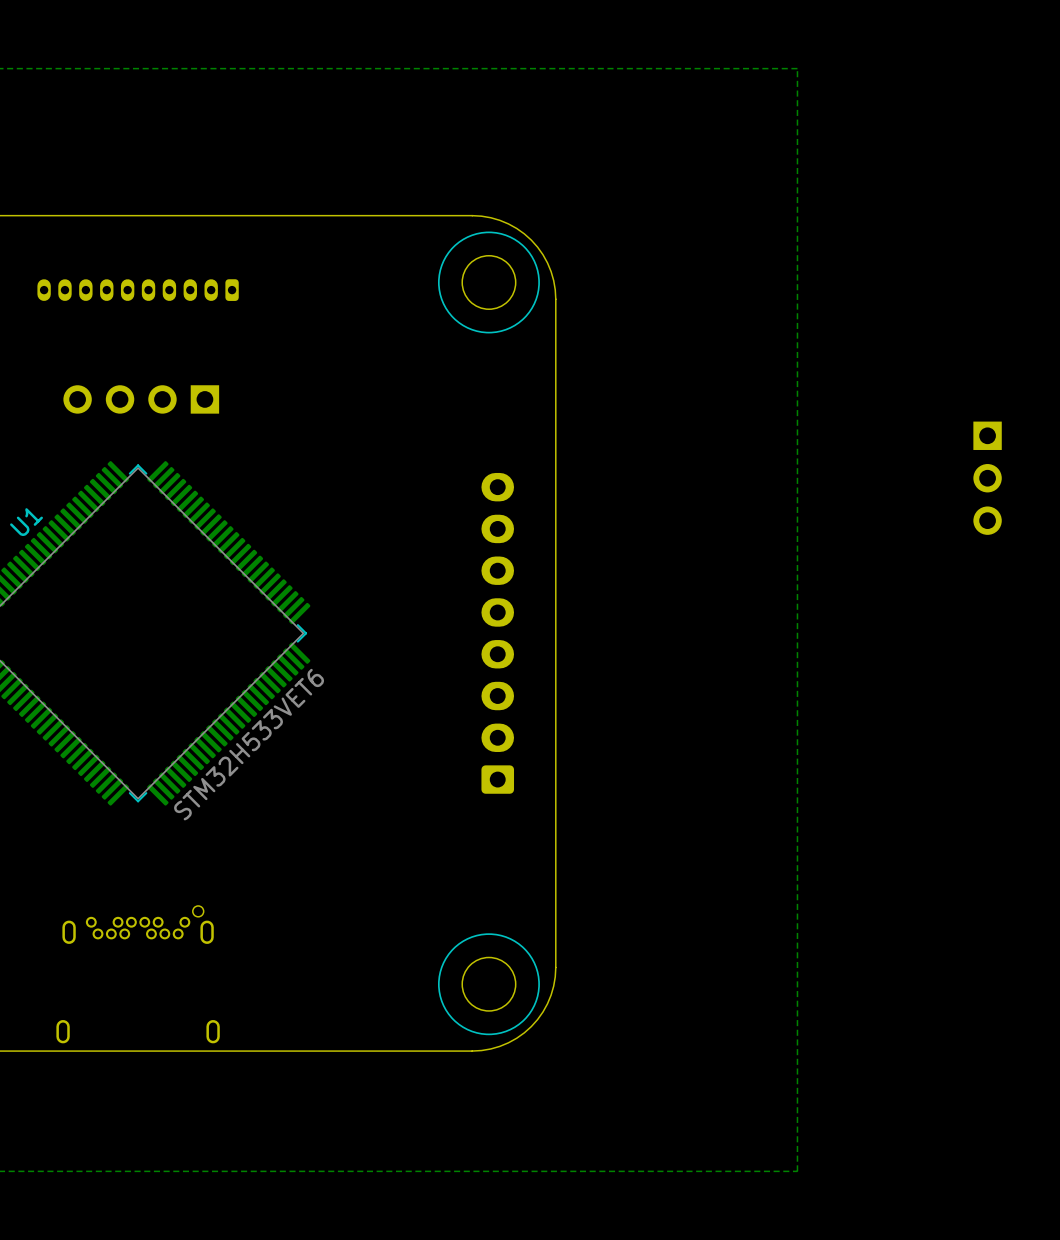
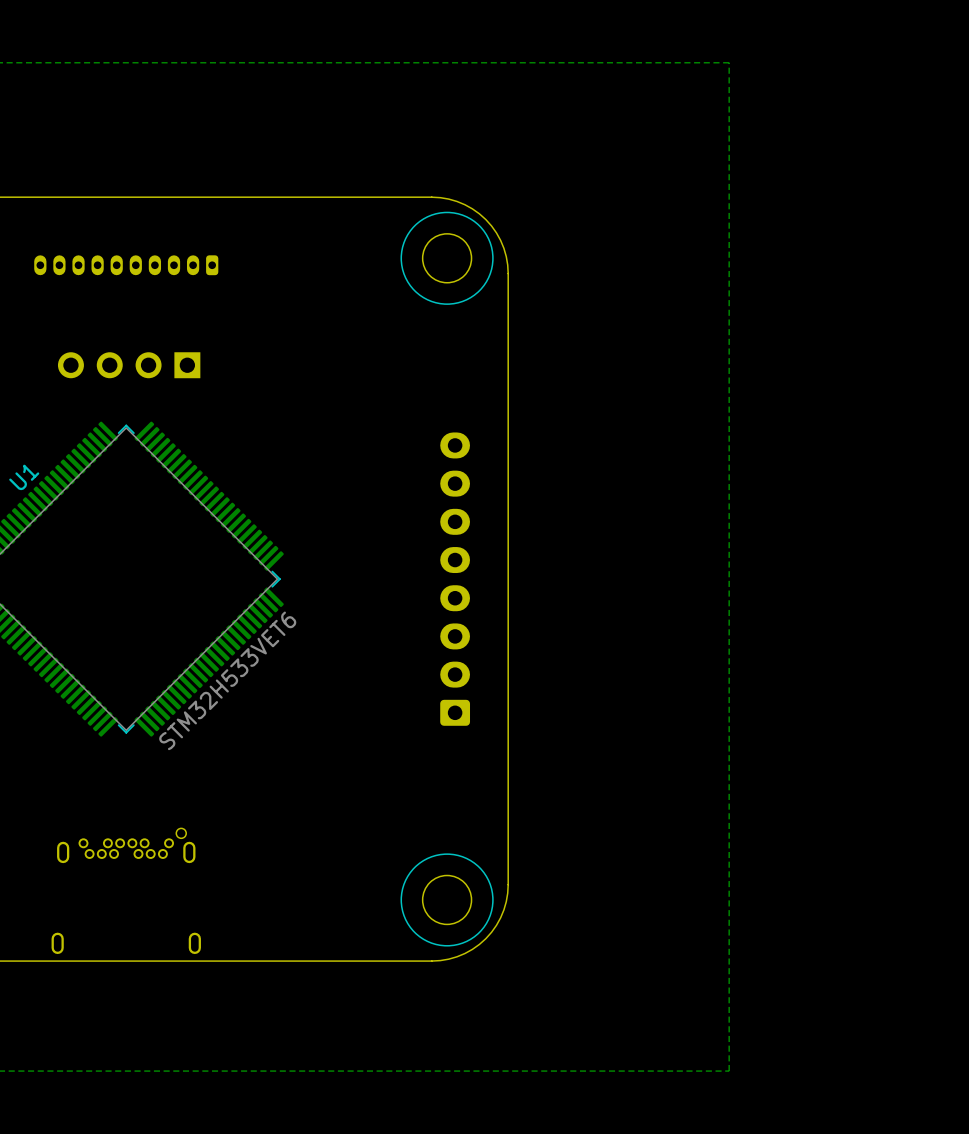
part: (987, 478) -> none

